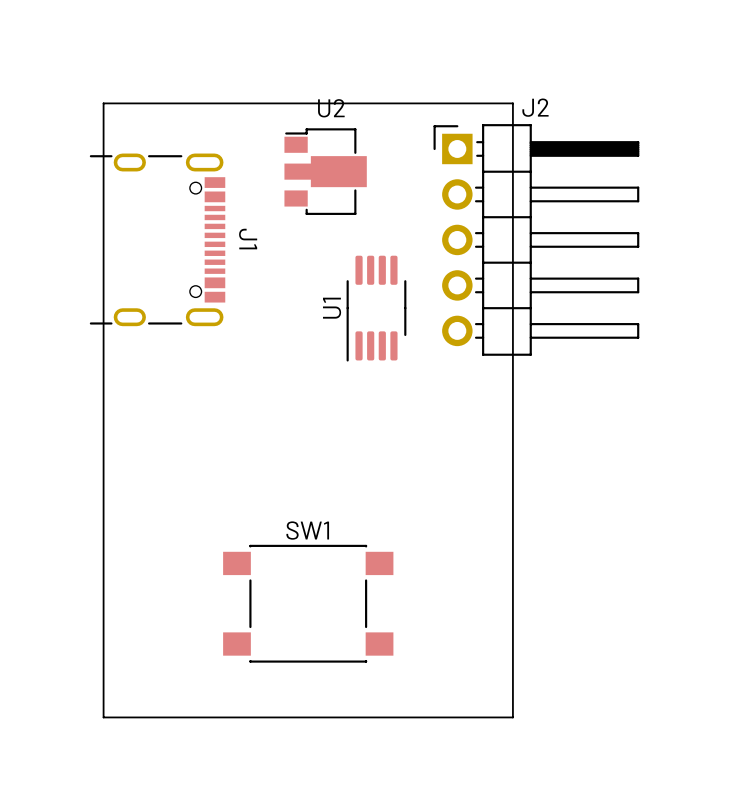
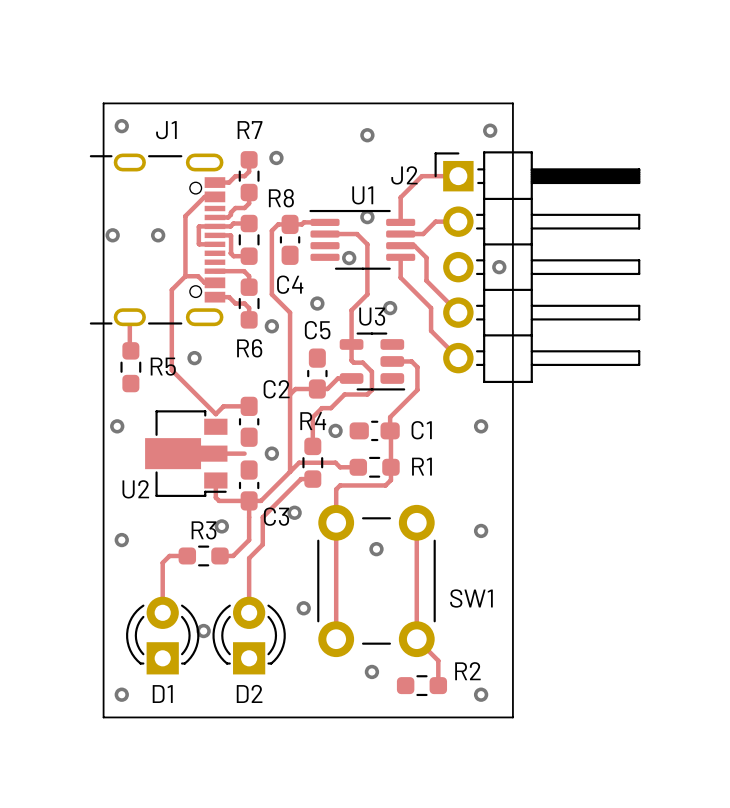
J2 name position: J2 (535, 107) -> J2 (404, 175)
U2 name position: U2 (331, 108) -> U2 (135, 489)
via: none -> (121, 126)
via: none -> (490, 130)
via: none -> (367, 135)
via: none -> (276, 157)
track: none -> (249, 159) (249, 171) (244, 176) (235, 176) (229, 182) (214, 182)
U2 rotation: 0° (325, 171) -> 180° (186, 453)
U2 position: (325, 171) -> (186, 453)
R7: none -> (249, 176)
track: none -> (458, 176) (421, 176) (400, 197) (400, 222)
track: none -> (249, 192) (249, 203) (244, 208) (235, 208) (228, 217) (214, 217)
track: none -> (214, 196) (204, 196) (185, 216) (185, 276)
via: none -> (367, 217)
track: none -> (458, 221) (435, 221) (423, 234) (400, 234)
track: none -> (325, 222) (278, 224) (271, 230) (271, 294) (290, 312) (290, 471)
track: none -> (249, 223) (233, 223) (230, 226) (199, 226) (198, 243) (214, 244)
track: none -> (325, 234) (357, 234) (367, 244) (367, 294) (351, 310) (351, 360) (353, 362) (362, 362) (371, 371) (371, 389) (367, 394) (344, 394) (331, 408) (321, 408) (312, 417) (312, 446)
via: none -> (112, 235)
via: none -> (158, 235)
track: none -> (214, 235) (230, 235) (230, 253) (233, 256) (249, 256)
J1 name rotation: 0° (248, 239) -> 90° counterclockwise (166, 130)
J1 name position: J1 (248, 239) -> J1 (166, 130)
R8: none -> (249, 239)
C4: none -> (290, 239)
J2 position: (536, 239) -> (537, 267)
track: none -> (400, 245) (414, 245) (426, 257) (426, 280) (458, 312)
track: none -> (400, 257) (400, 277) (431, 308) (431, 330) (458, 358)
via: none -> (349, 258)
via: none -> (499, 267)
track: none -> (214, 271) (244, 271) (249, 276) (249, 287)
track: none -> (185, 276) (198, 276) (204, 282) (214, 282)
track: none -> (185, 276) (171, 289) (171, 370) (215, 414) (223, 406) (249, 406)
track: none -> (214, 297) (229, 297) (235, 303) (244, 303) (249, 308) (249, 319)
R6: none -> (249, 303)
via: none -> (317, 303)
U1 rotation: 0° (376, 308) -> 90° clockwise (362, 239)
U1 position: (376, 308) -> (362, 239)
via: none -> (390, 308)
track: none -> (129, 317) (130, 350)
via: none -> (271, 326)
via: none -> (194, 358)
U3: none -> (372, 361)
track: none -> (392, 361) (411, 361) (417, 367) (417, 389) (390, 417) (390, 480) (385, 485) (340, 485) (336, 489) (336, 639)
R5: none -> (130, 367)
C5: none -> (317, 373)
track: none -> (351, 378) (337, 378) (327, 389) (295, 389) (290, 394)
C2: none -> (249, 421)
via: none -> (117, 426)
via: none -> (481, 426)
via: none -> (335, 430)
C1: none -> (374, 430)
track: none -> (214, 453) (244, 453)
via: none -> (271, 453)
R4: none -> (312, 462)
track: none -> (358, 467) (340, 467) (335, 462) (299, 462) (260, 500) (219, 500) (215, 497) (215, 480)
R1: none -> (374, 467)
track: none -> (312, 479) (301, 479) (262, 517) (262, 544) (249, 558) (249, 612)
C3: none -> (249, 485)
track: none -> (249, 500) (249, 540) (233, 555) (219, 555)
via: none -> (294, 512)
track: none -> (416, 522) (416, 639) (438, 660) (438, 685)
via: none -> (221, 526)
SW1 name position: SW1 (307, 530) -> SW1 (471, 598)
via: none -> (481, 530)
via: none -> (121, 540)
SW1 footprint: [223, 544, 394, 663] -> [317, 504, 436, 658]
via: none -> (376, 549)
track: none -> (187, 555) (169, 555) (162, 562) (162, 612)
R3: none -> (203, 555)
via: none -> (303, 608)
via: none -> (203, 631)
D1: none -> (162, 635)
D2: none -> (249, 635)
via: none -> (371, 671)
R2: none -> (421, 685)
via: none -> (121, 694)
via: none -> (481, 694)

